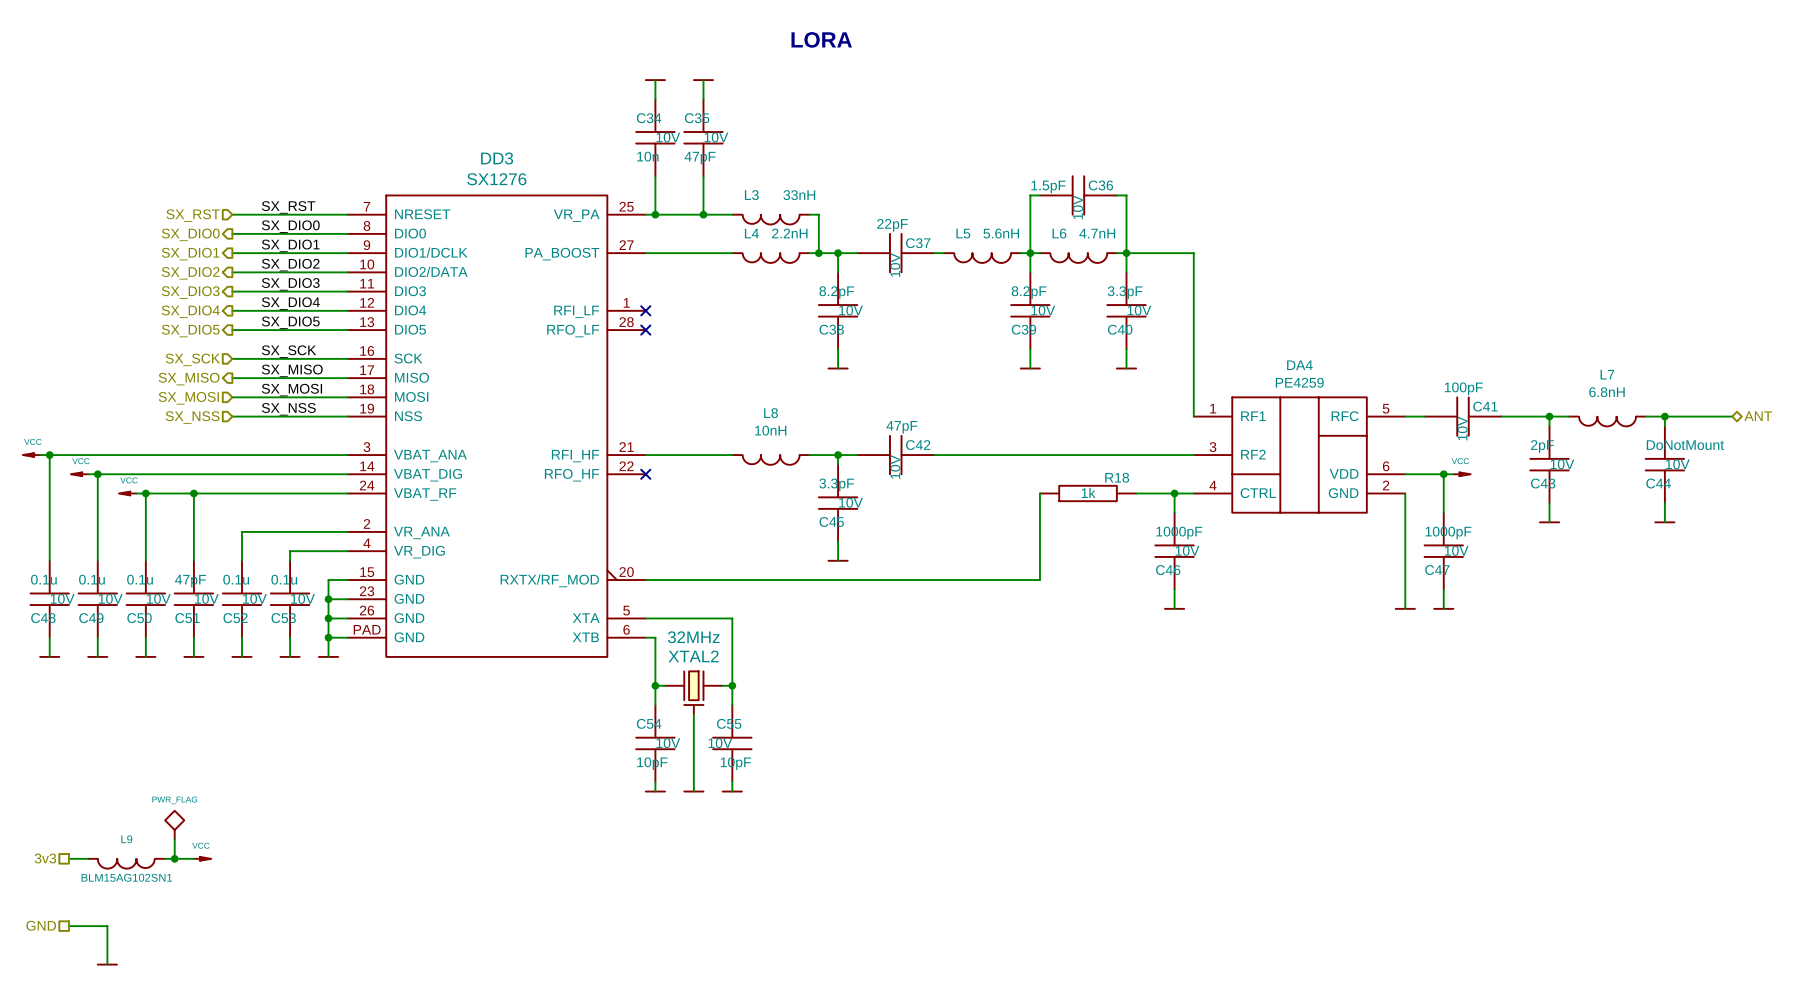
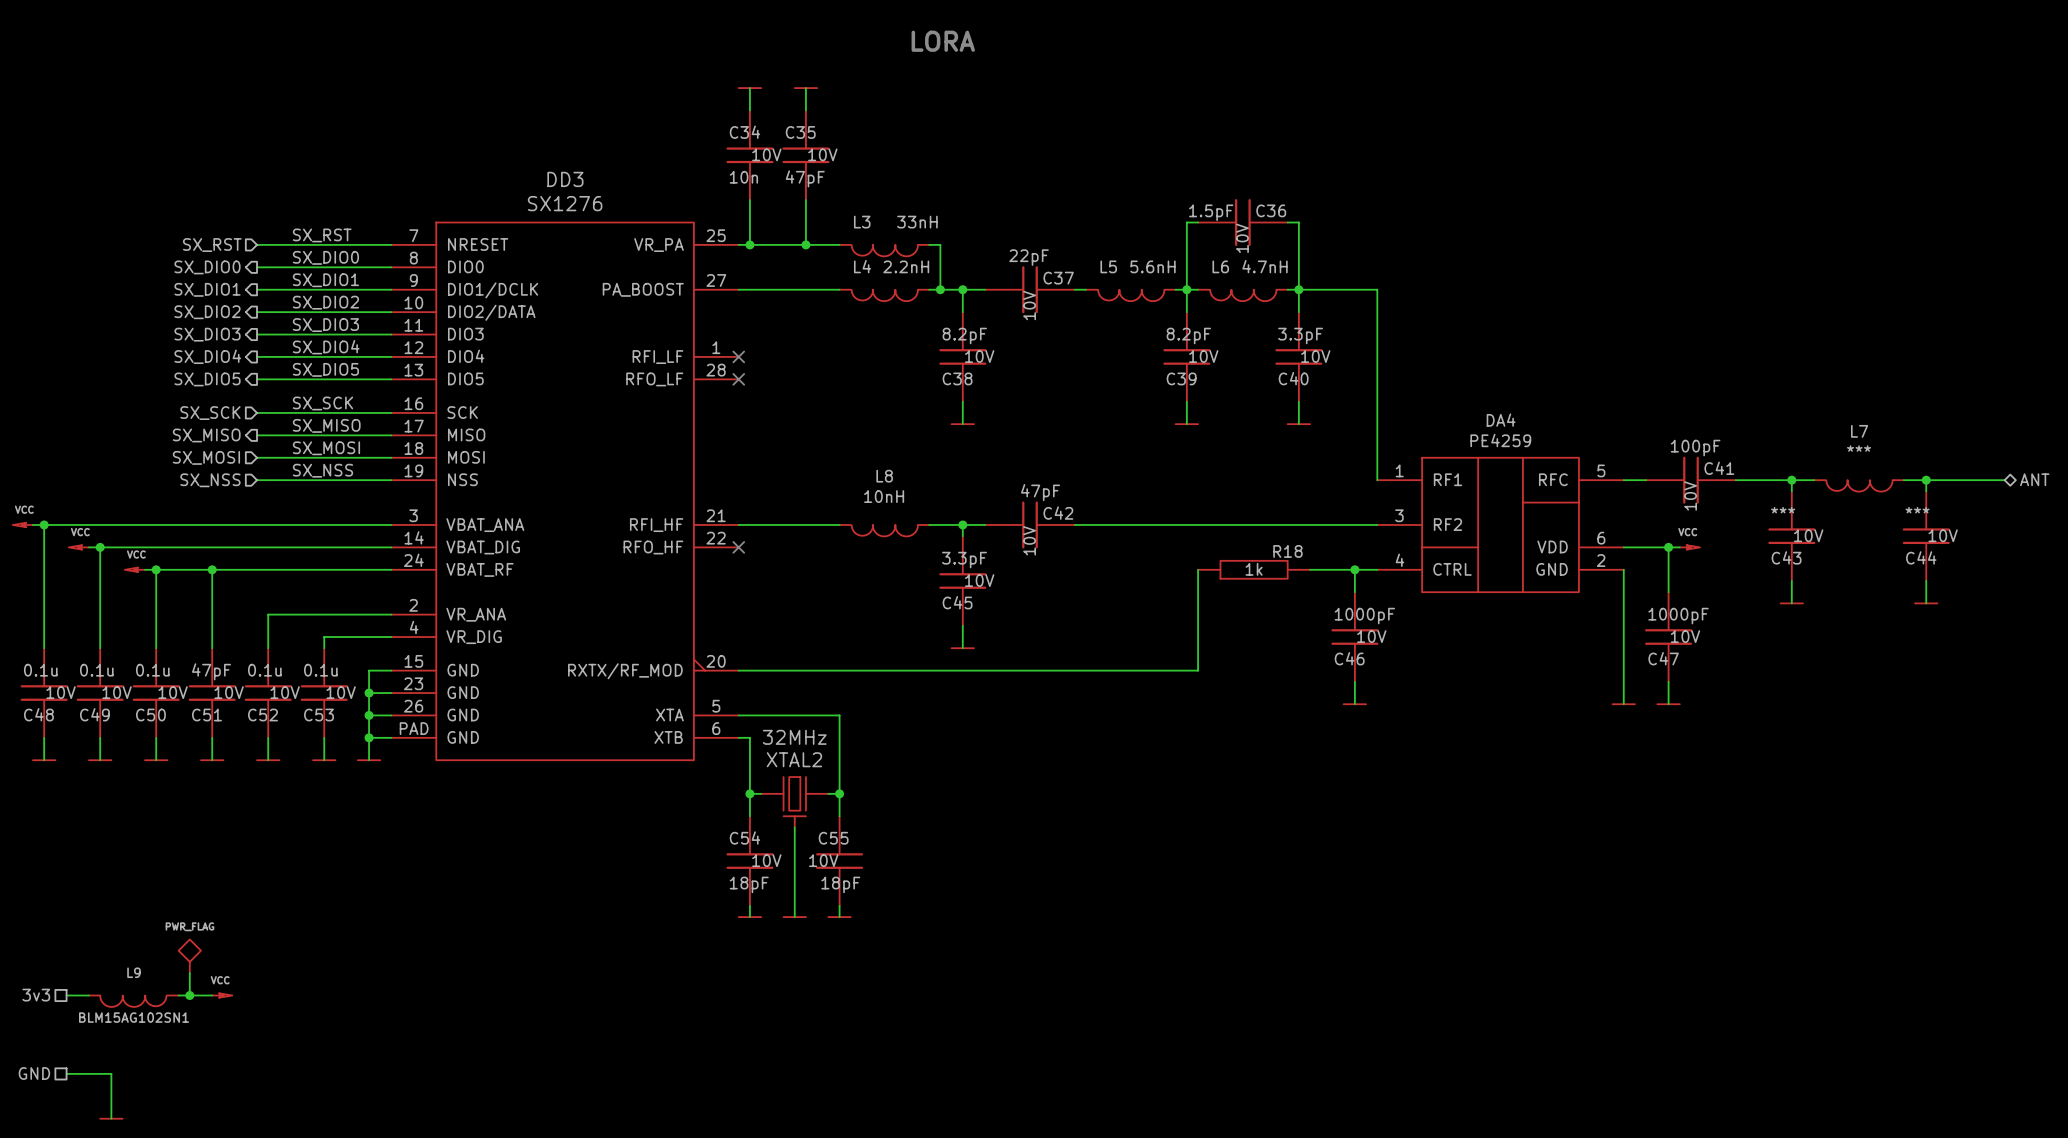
L7 value: 6.8nH (1606, 392) -> *** (1859, 448)
C44 value: DoNotMount (1685, 445) -> *** (1917, 510)
C43 value: 2pF (1542, 446) -> *** (1783, 510)
C54 value: 10pF (652, 763) -> 18pF (749, 884)
C55 value: 10pF (735, 763) -> 18pF (840, 884)

